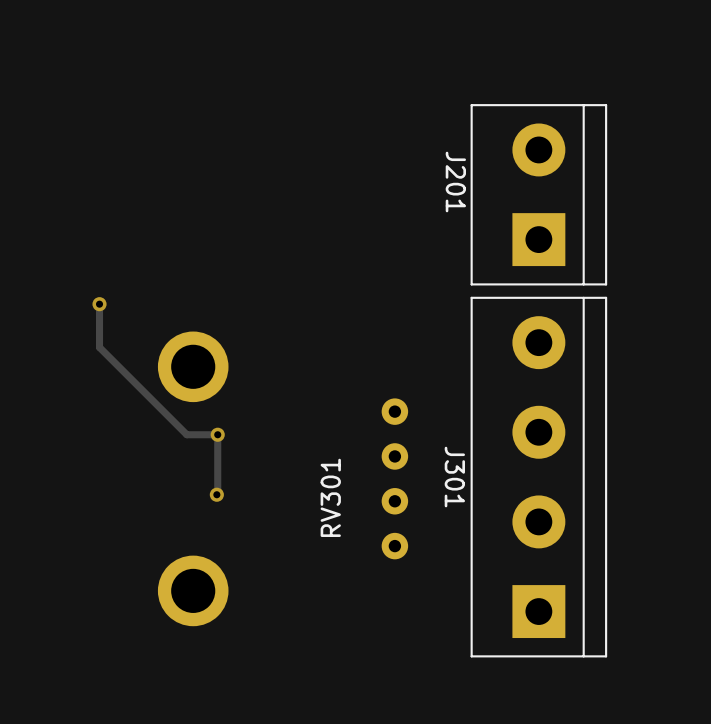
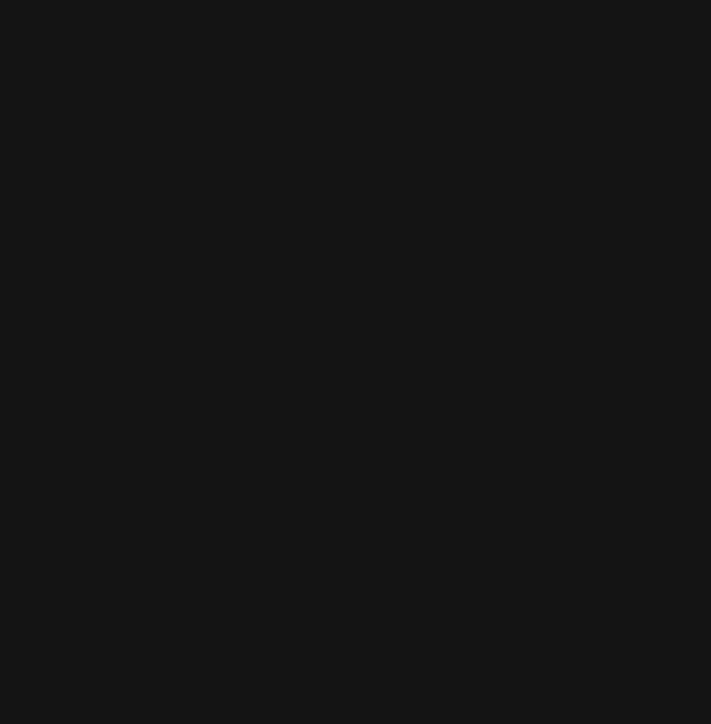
J201: (538, 194) -> none
track: (99, 304) (99, 347) (186, 434) (217, 434) (216, 494) -> none
via: (99, 304) -> none
via: (217, 434) -> none
J301: (538, 477) -> none
RV301: (283, 478) -> none
via: (216, 494) -> none

